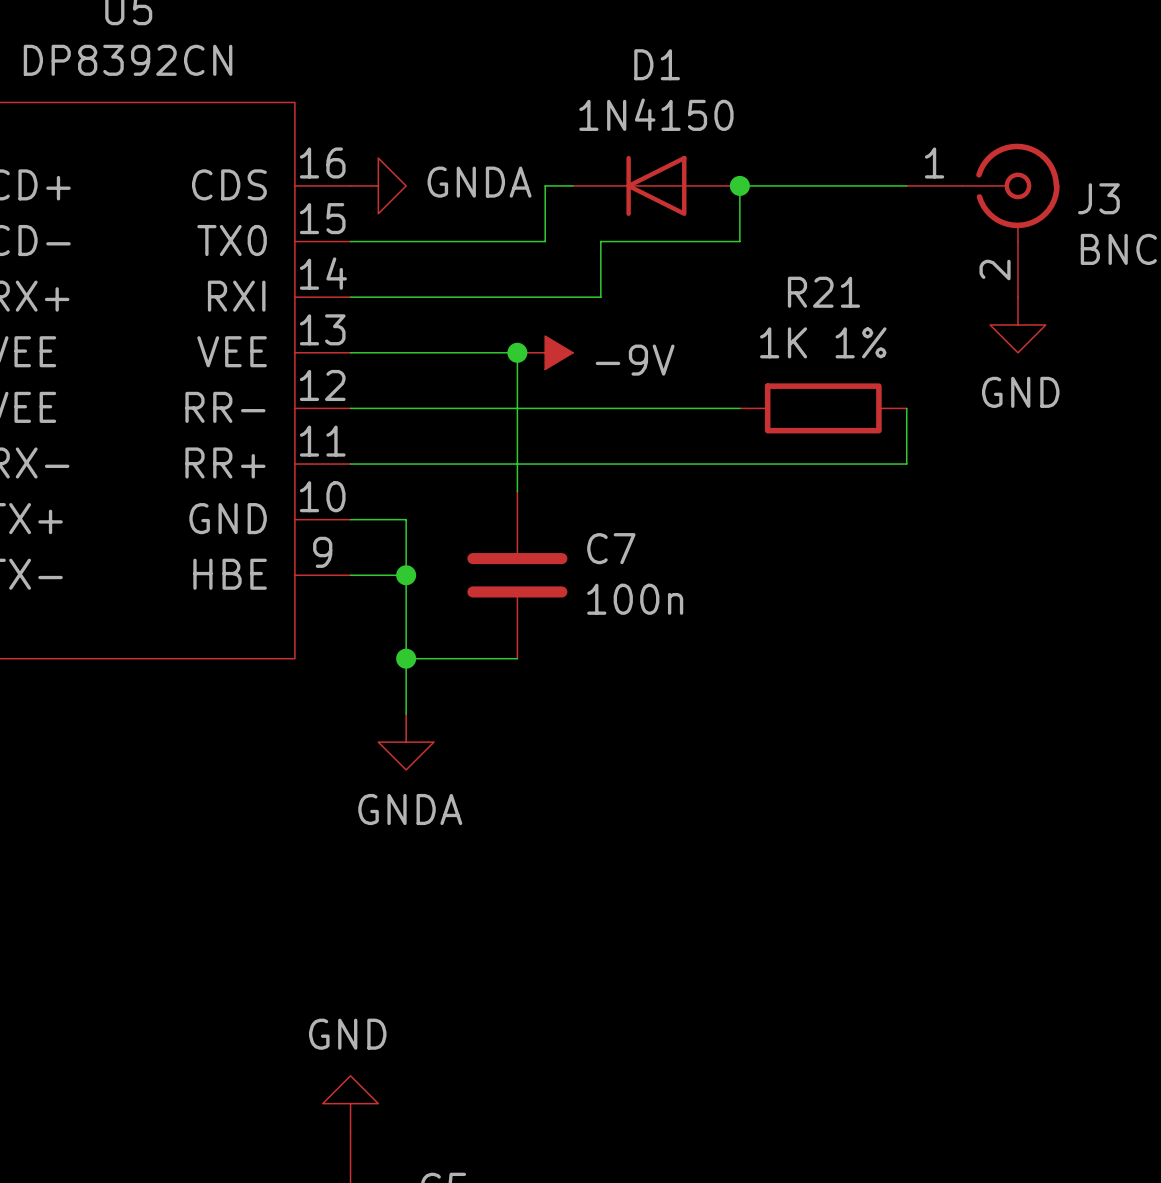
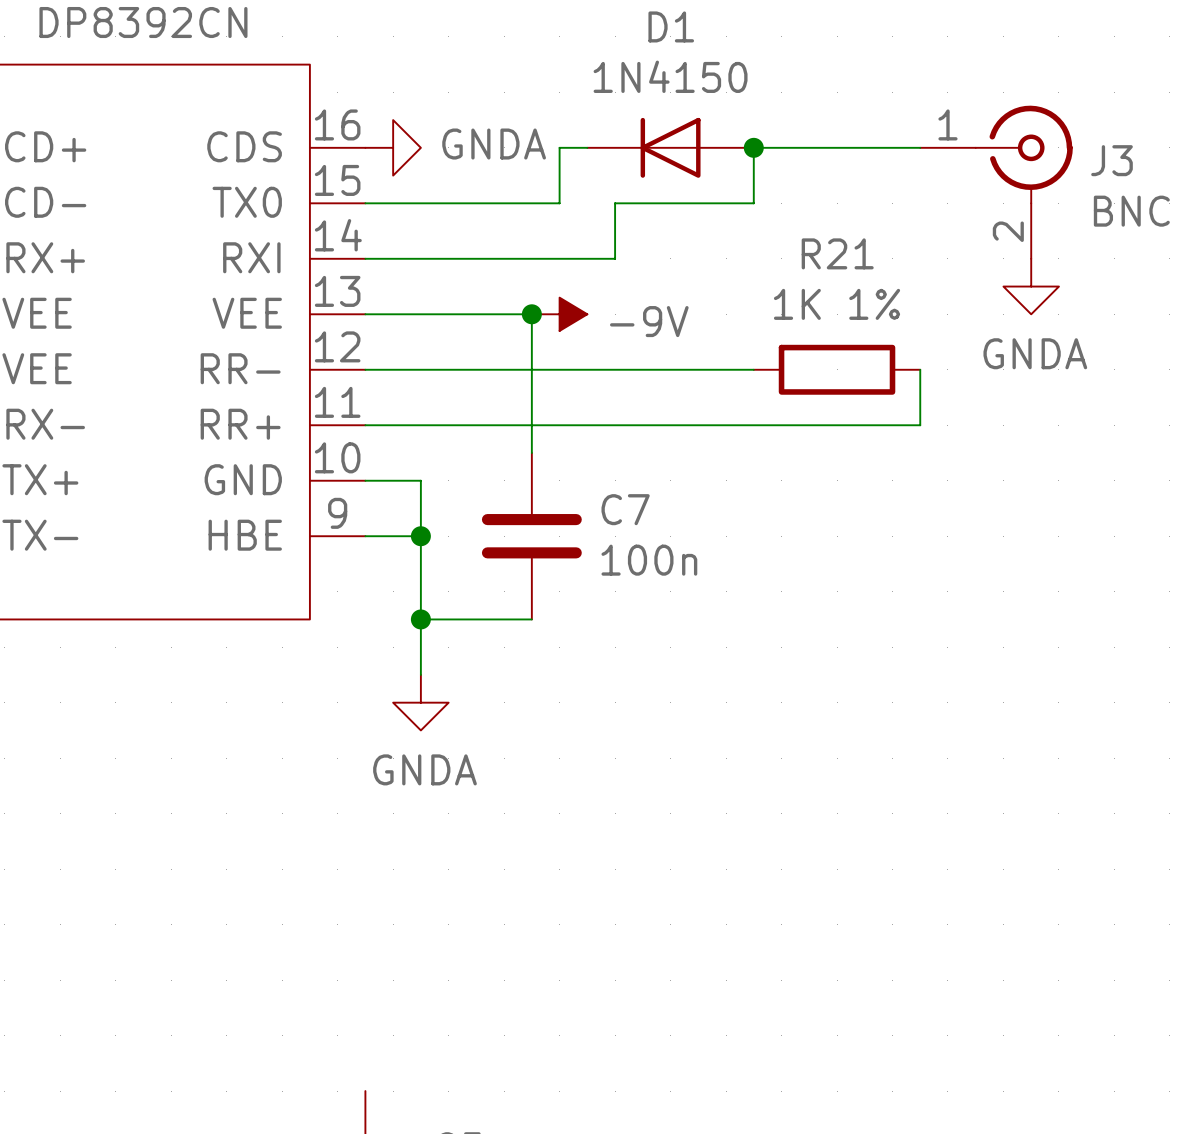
power symbol: GND (1017, 324) -> GNDA (1031, 286)
power symbol: GND (350, 1103) -> none

